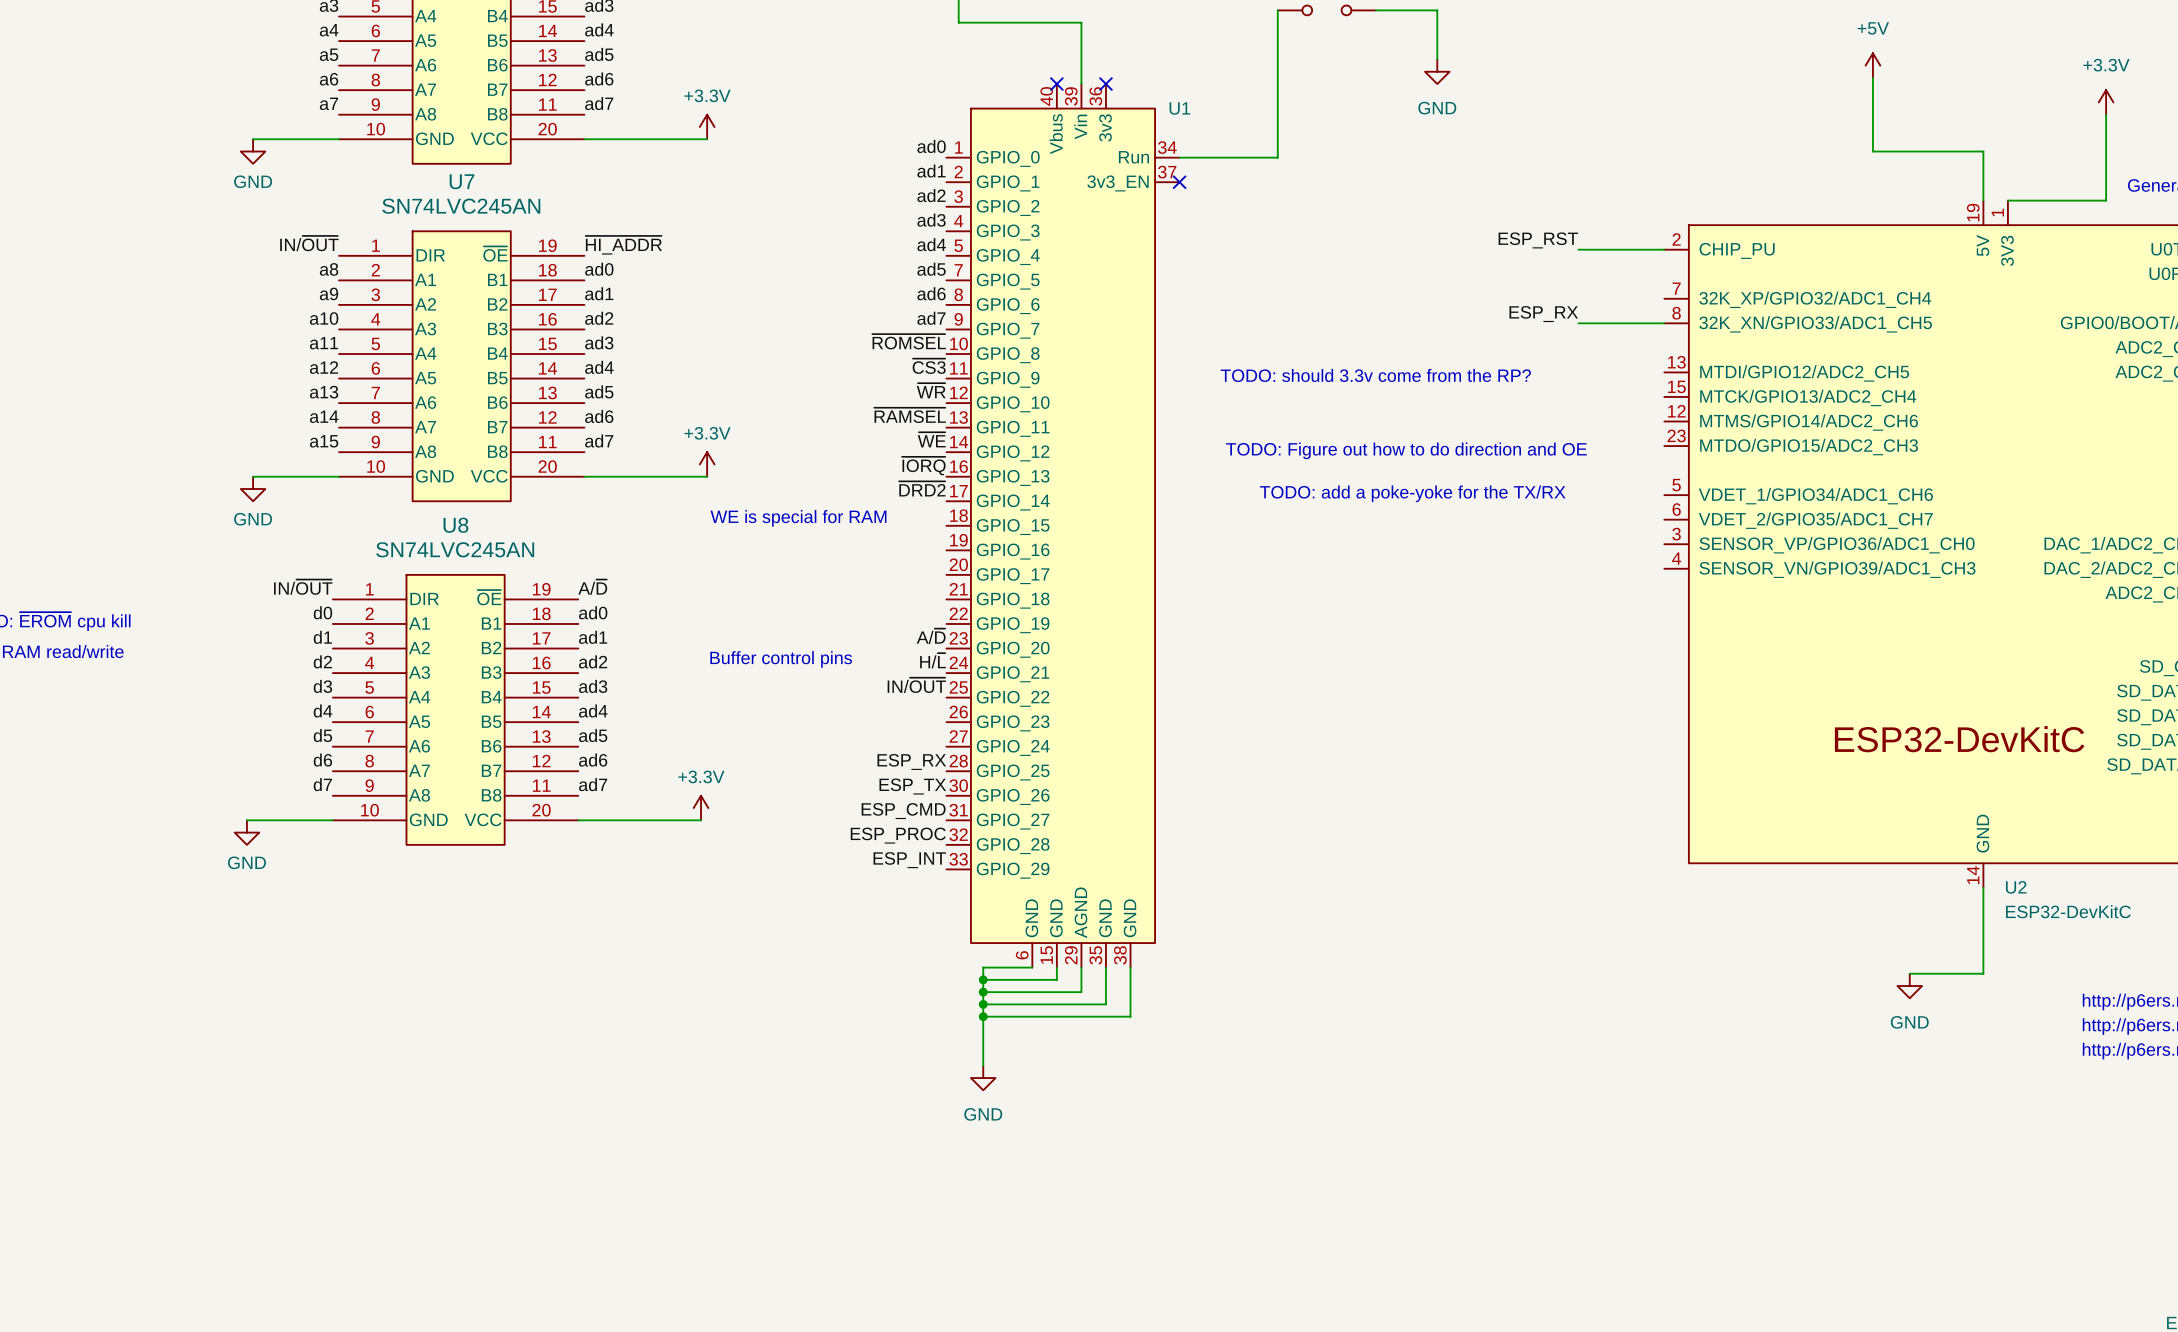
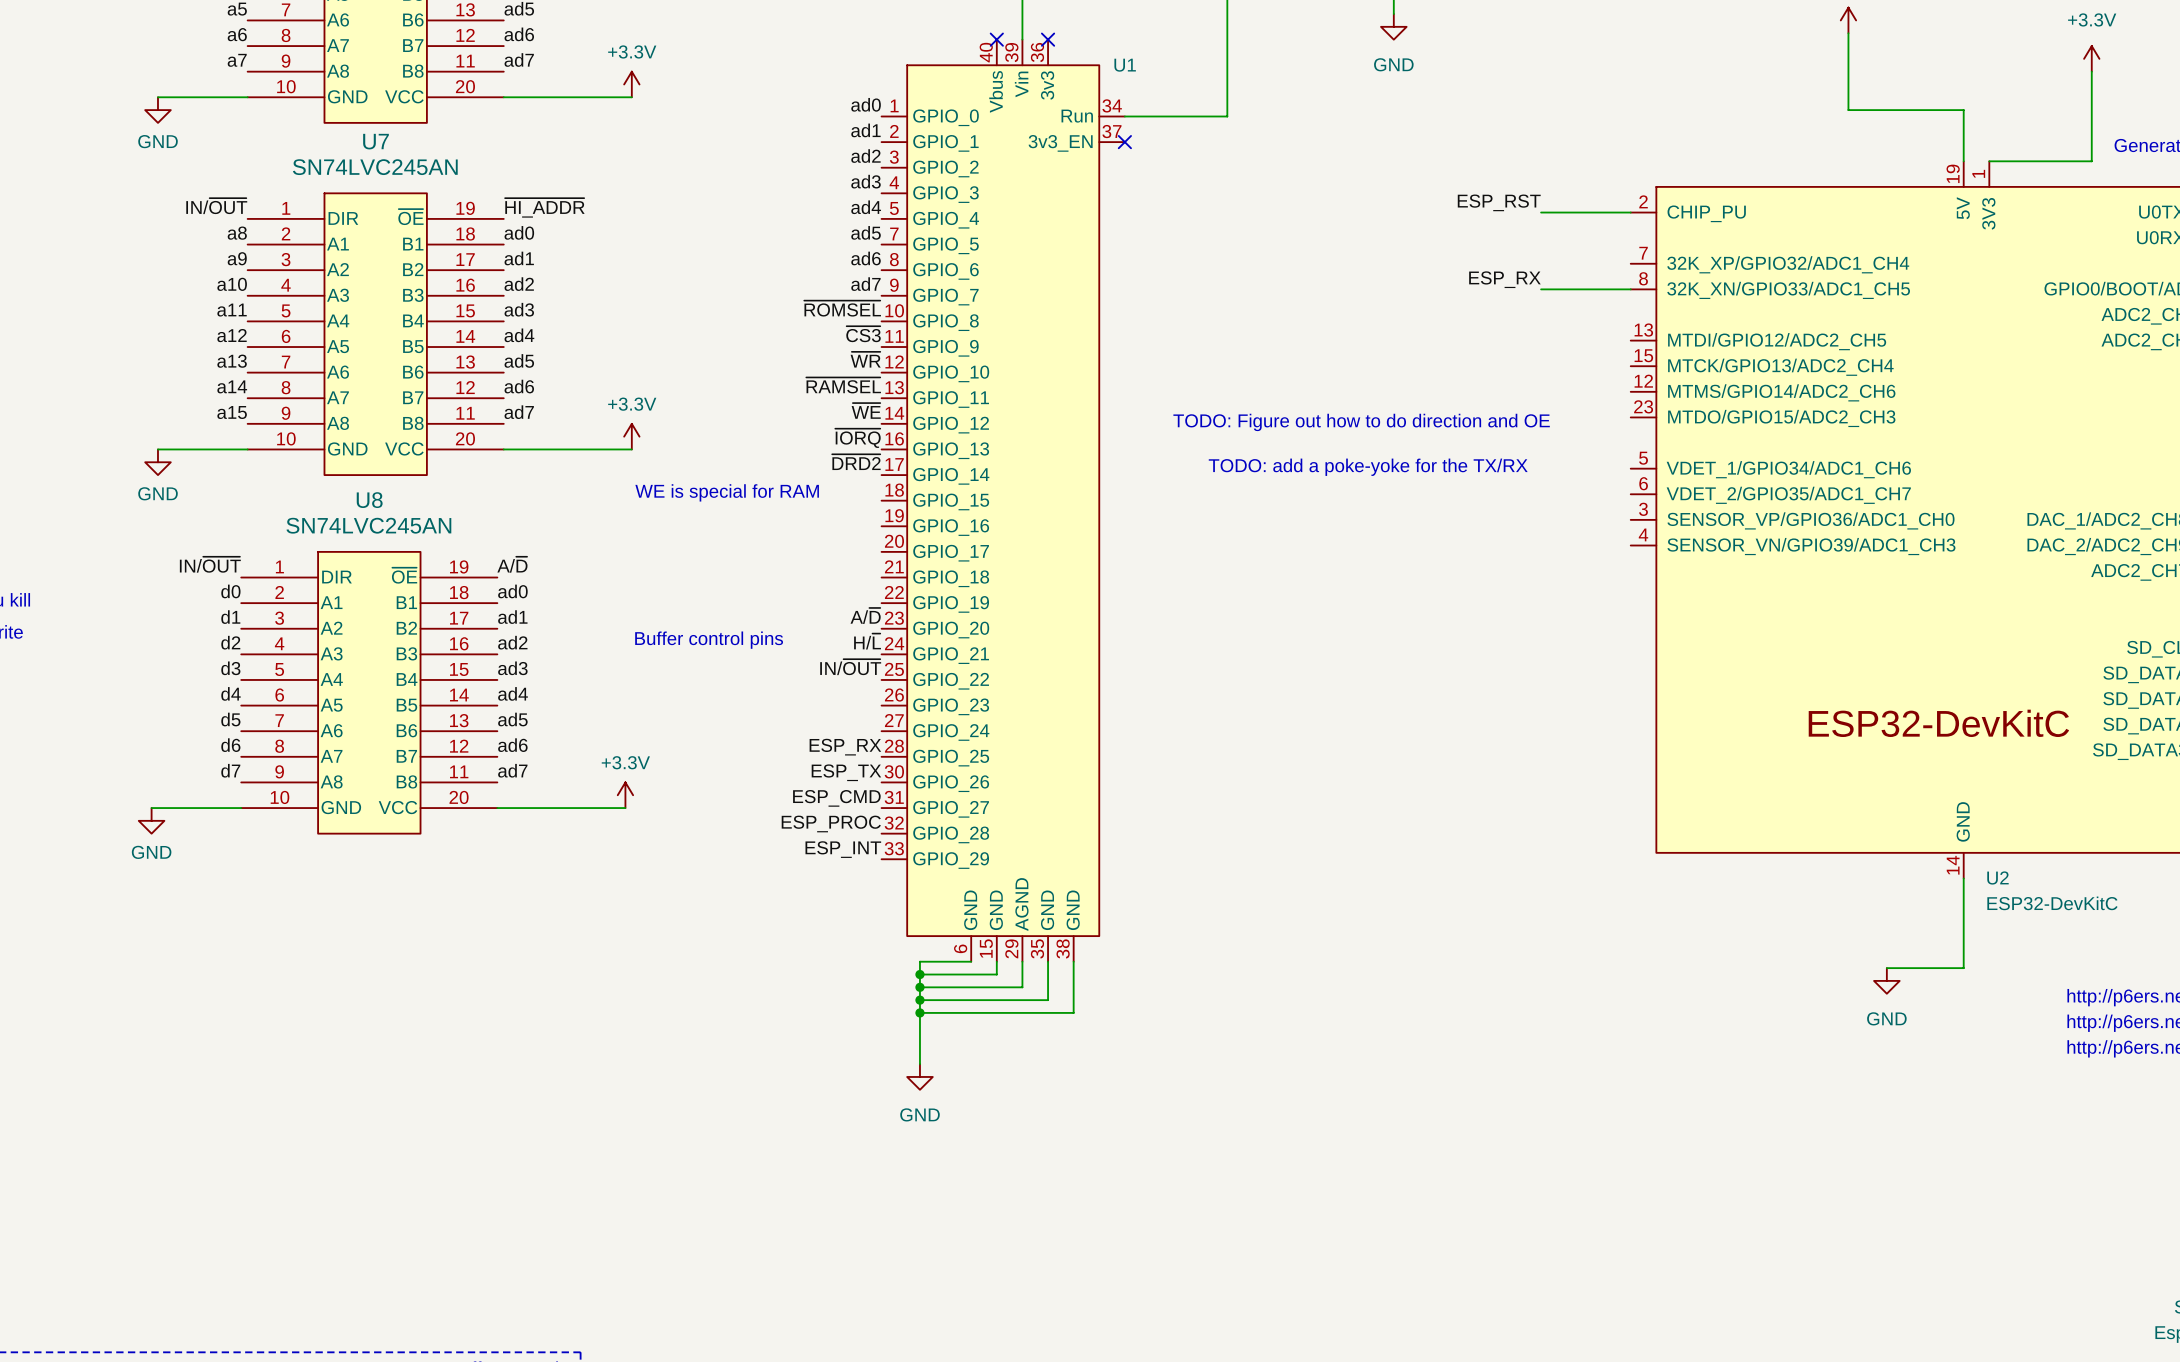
text: TODO: should 3.3v come from the RP? (1375, 375) -> none

